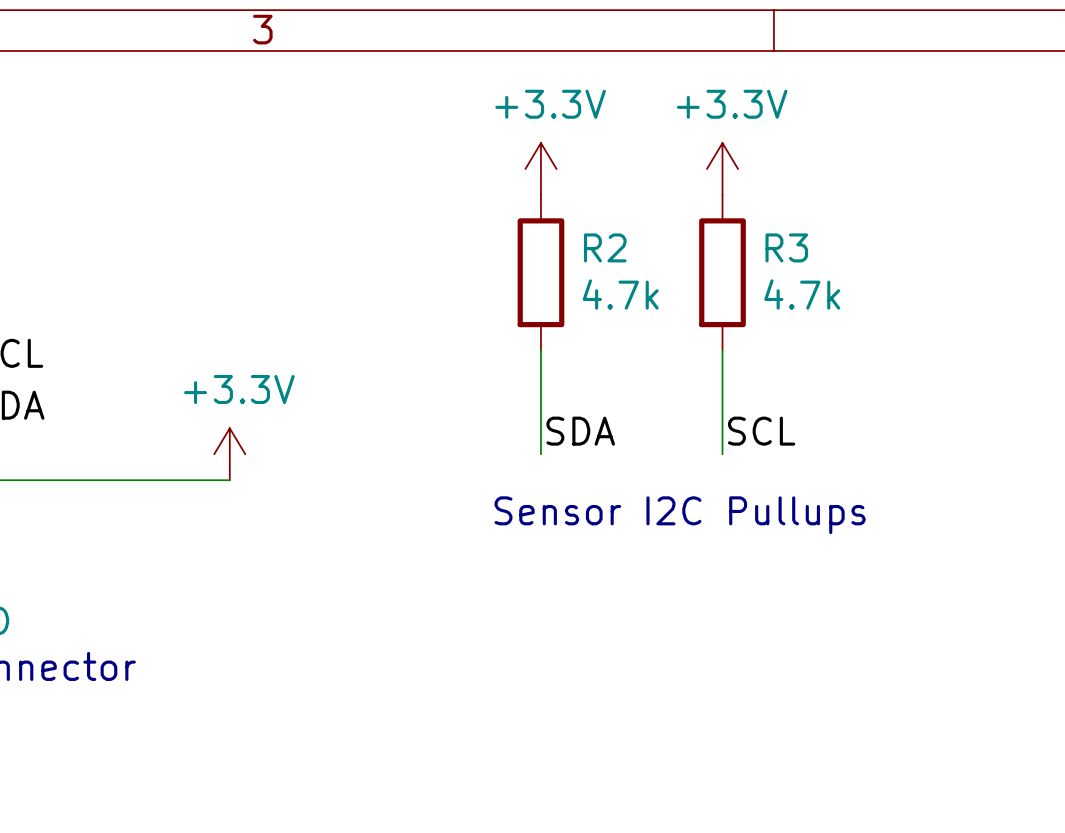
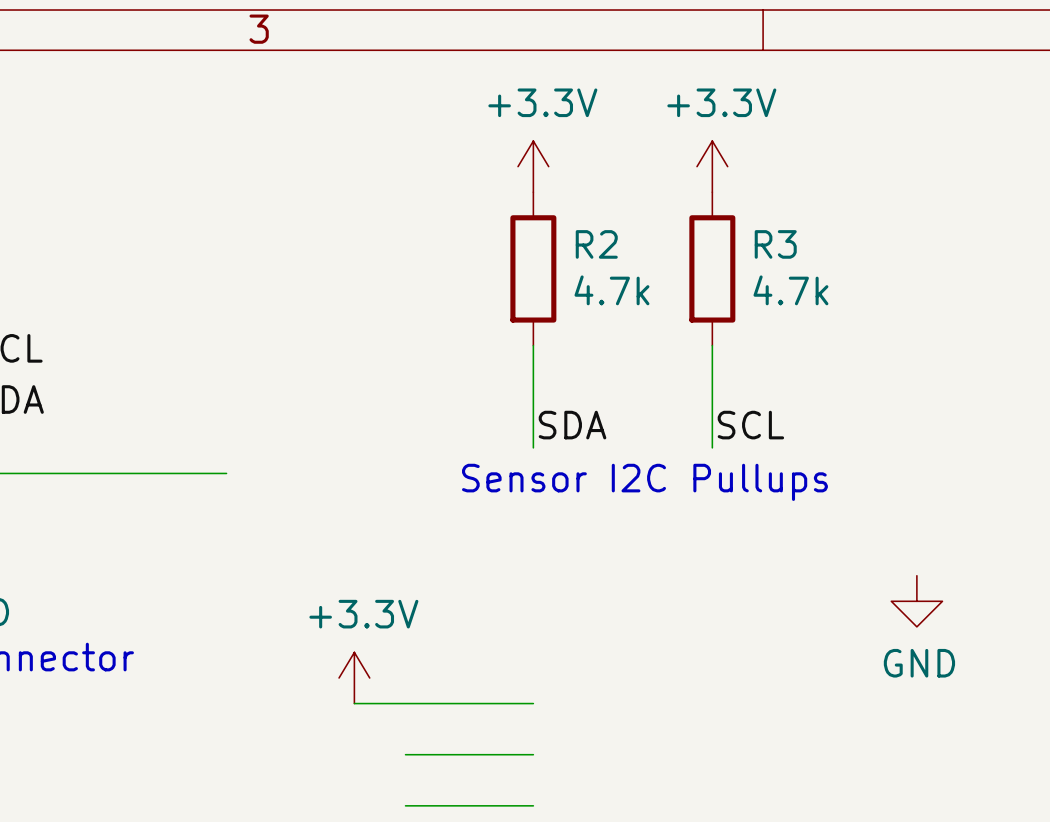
power symbol: +3.3V (229, 454) -> none
text position: Sensor I2C Pullups (680, 515) -> Sensor I2C Pullups (644, 482)
power symbol: none -> GND (916, 601)
power symbol: none -> +3.3V (354, 678)
wire: none -> (354, 703) (533, 703)
wire: none -> (405, 754) (533, 754)
wire: none -> (405, 805) (533, 805)

